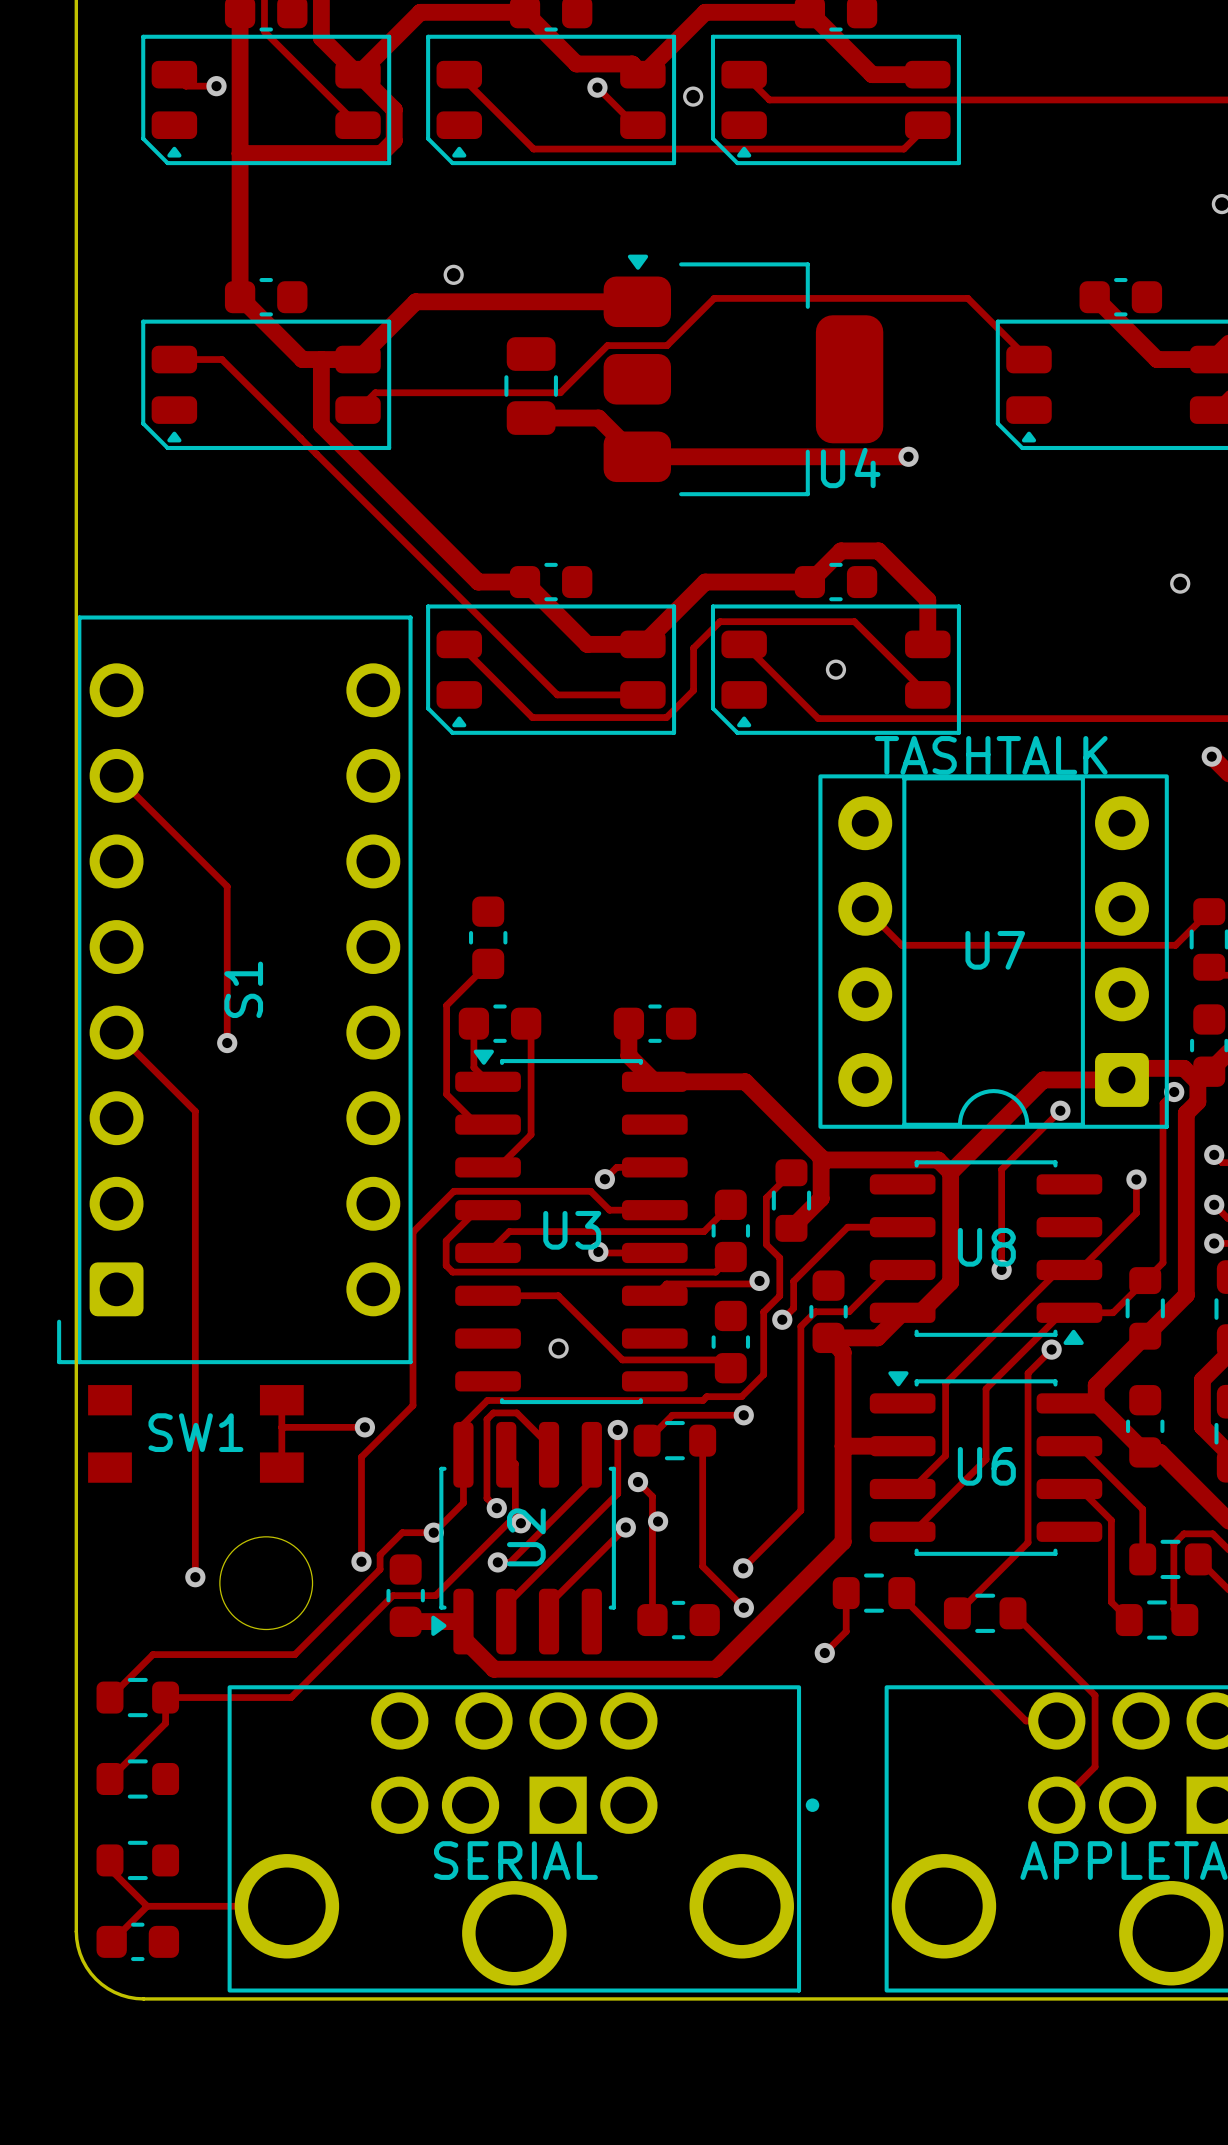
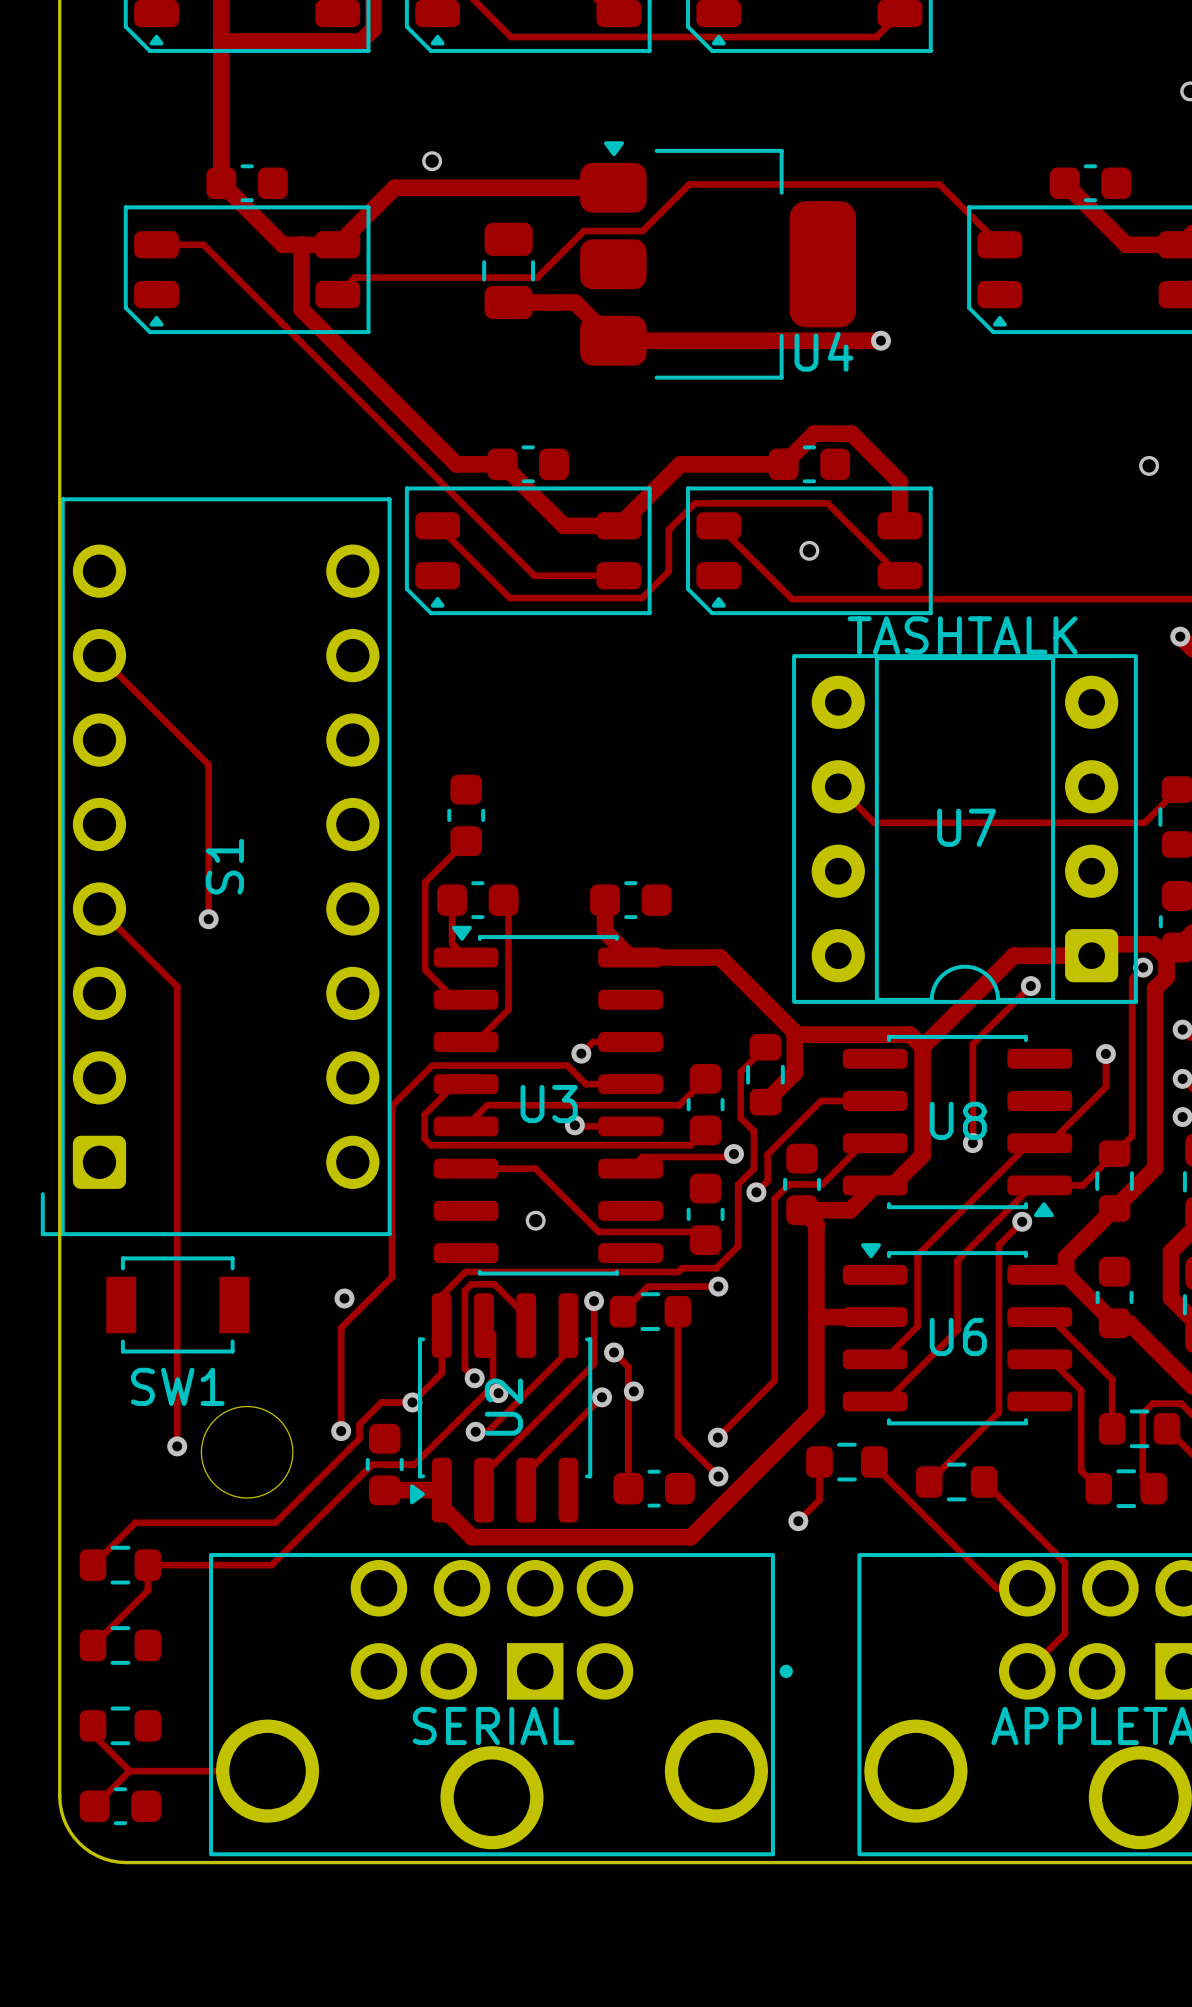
SW1 footprint: [88, 1385, 304, 1483] -> [106, 1256, 250, 1354]
track: (281, 1400) (281, 1467) -> none
track: (281, 1427) (364, 1427) -> none
SW1 name position: SW1 (195, 1432) -> SW1 (177, 1386)

